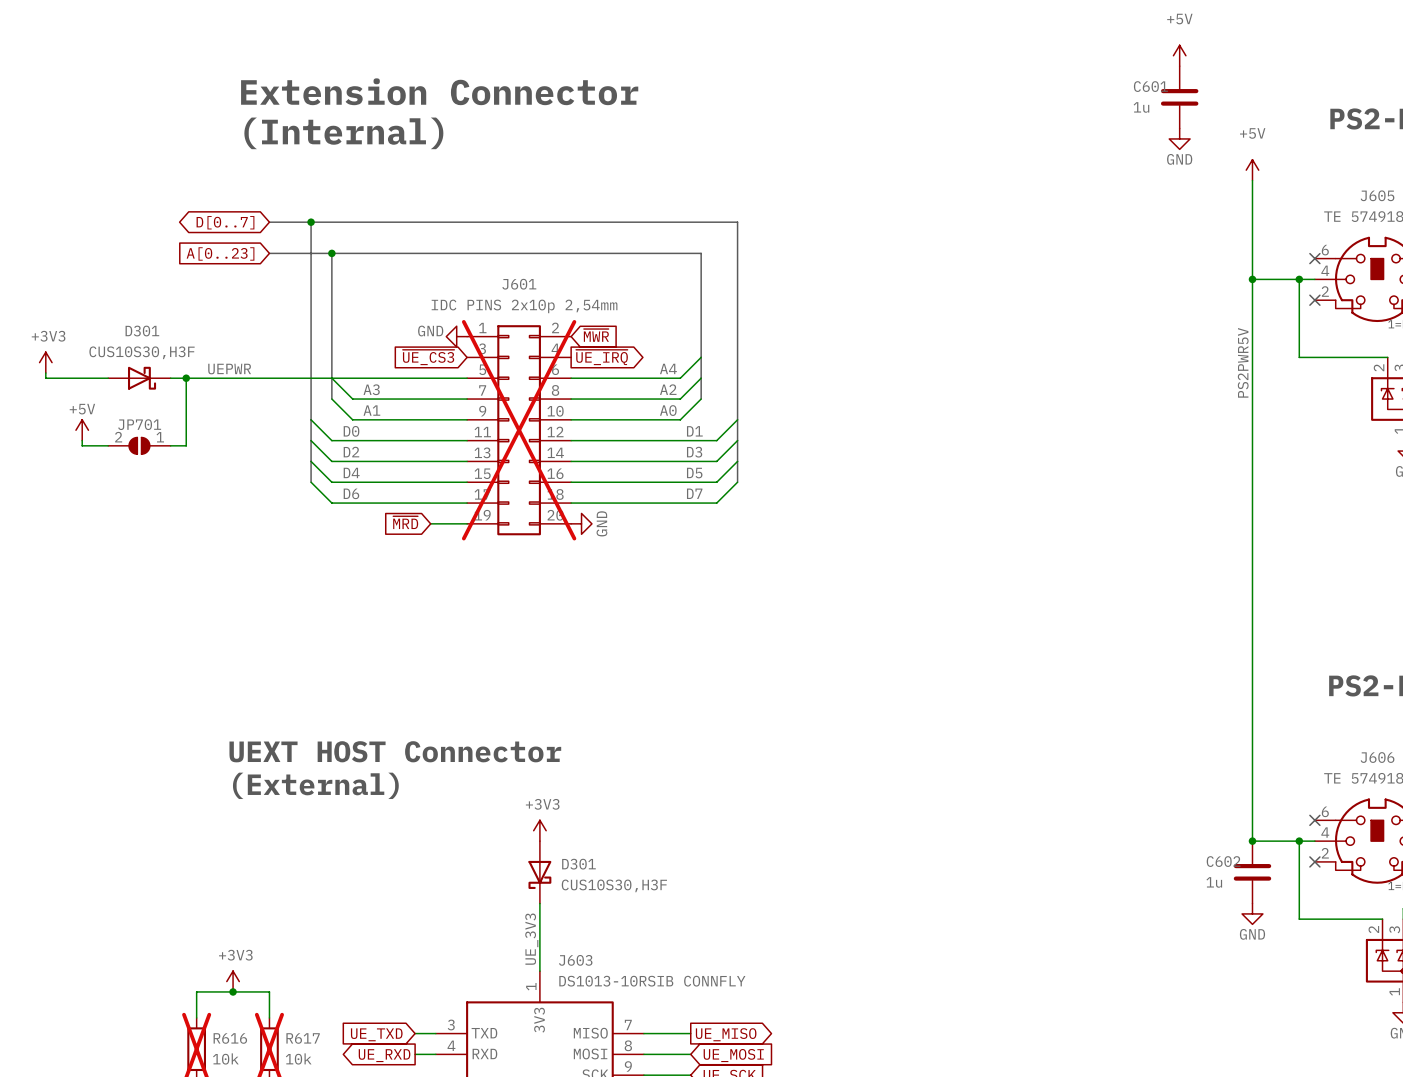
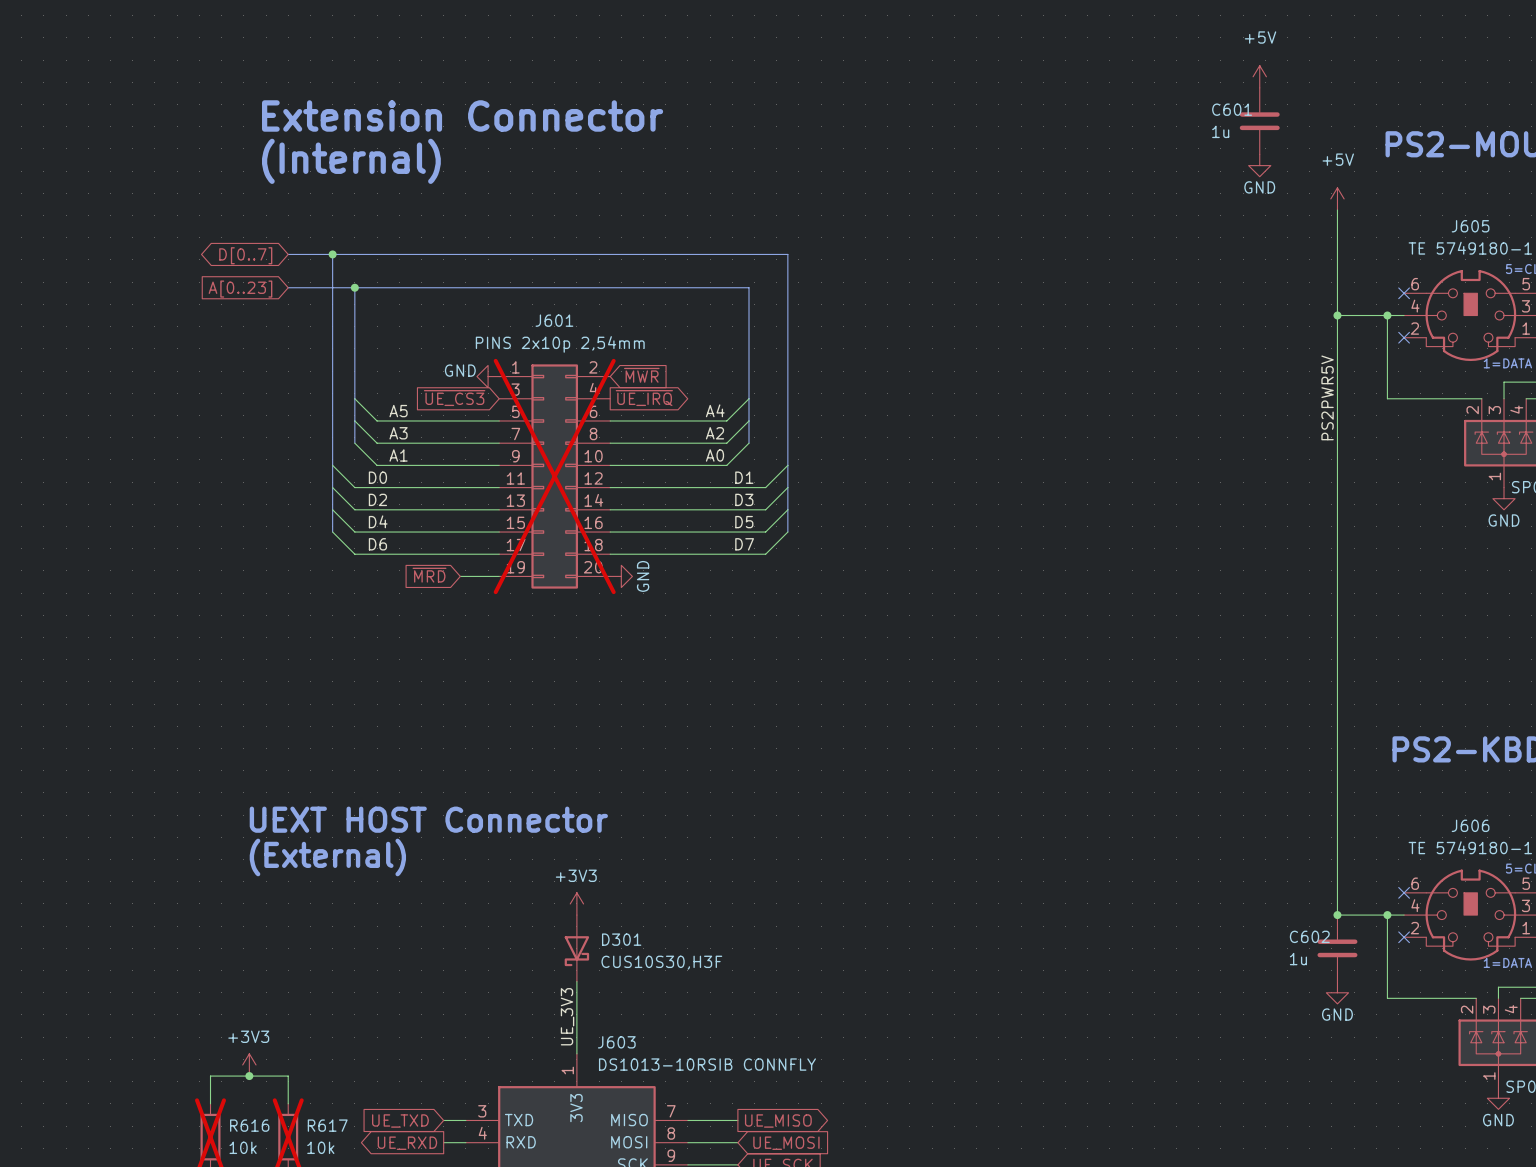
J601 value: IDC PINS 2x10p 2,54mm (524, 306) -> PINS 2x10p 2,54mm (560, 344)
power symbol: +3V3 (45, 362) -> none
label: UEPWR (229, 369) -> none
label: none -> A5 (398, 411)
wire: (45, 373) (45, 378) (108, 378) -> none
D301: CUS10S30,H3F (139, 378) -> none
wire: (170, 378) (352, 378) -> (354, 398) (377, 420)
wire: (186, 378) (186, 445) (170, 445) -> none
junction: (186, 378) -> none
power symbol: +5V (82, 430) -> none
wire: (82, 440) (82, 445) (108, 445) -> none
JP701: (139, 445) -> none

